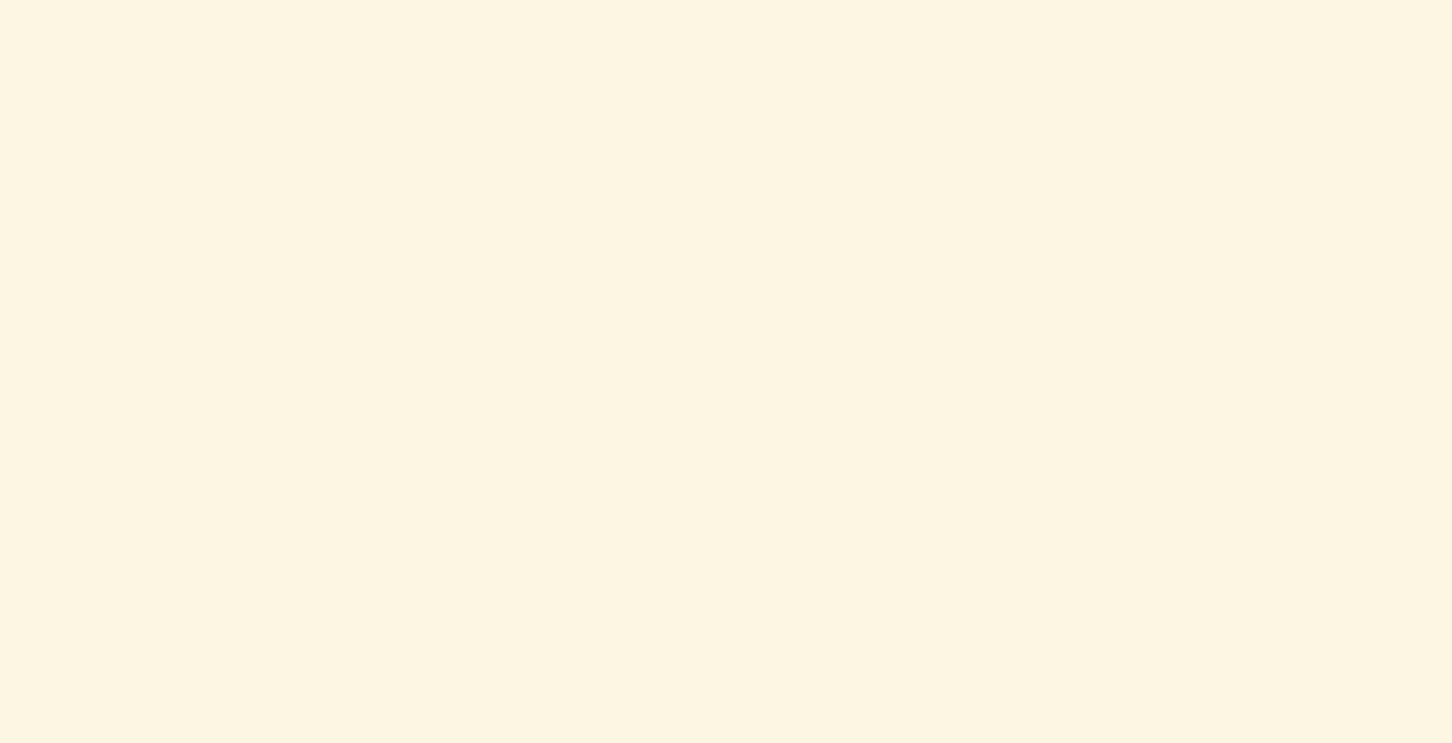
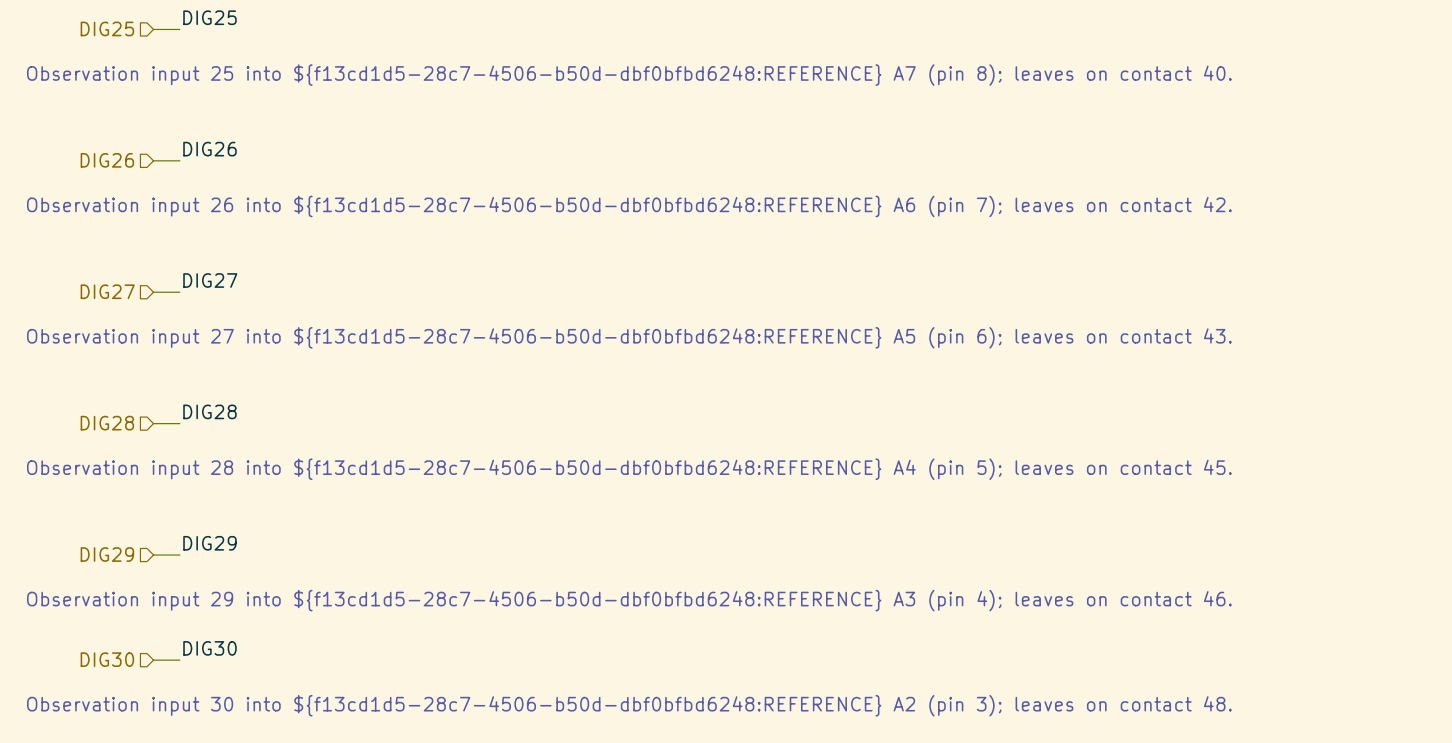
label: none -> DIG25 (209, 17)
hierarchical label: none -> DIG25 (107, 28)
wire: none -> (153, 29) (179, 29)
text: none -> Observation input 25 into ${f13cd1d5-28c7-4506-b50d-dbf0bfbd6248:REFERENCE} A7 (pin 8); leaves on contact 40. (629, 75)
label: none -> DIG26 (209, 149)
hierarchical label: none -> DIG26 (107, 160)
wire: none -> (153, 160) (179, 160)
text: none -> Observation input 26 into ${f13cd1d5-28c7-4506-b50d-dbf0bfbd6248:REFERENCE} A6 (pin 7); leaves on contact 42. (629, 206)
label: none -> DIG27 (210, 280)
hierarchical label: none -> DIG27 (107, 291)
wire: none -> (153, 292) (179, 292)
text: none -> Observation input 27 into ${f13cd1d5-28c7-4506-b50d-dbf0bfbd6248:REFERENCE} A5 (pin 6); leaves on contact 43. (629, 337)
label: none -> DIG28 (209, 411)
hierarchical label: none -> DIG28 (107, 423)
wire: none -> (153, 423) (179, 423)
text: none -> Observation input 28 into ${f13cd1d5-28c7-4506-b50d-dbf0bfbd6248:REFERENCE} A4 (pin 5); leaves on contact 45. (629, 469)
label: none -> DIG29 (209, 543)
hierarchical label: none -> DIG29 (107, 554)
wire: none -> (153, 555) (179, 555)
text: none -> Observation input 29 into ${f13cd1d5-28c7-4506-b50d-dbf0bfbd6248:REFERENCE} A3 (pin 4); leaves on contact 46. (629, 600)
label: none -> DIG30 (209, 648)
hierarchical label: none -> DIG30 (107, 659)
wire: none -> (153, 660) (179, 660)
text: none -> Observation input 30 into ${f13cd1d5-28c7-4506-b50d-dbf0bfbd6248:REFERENCE} A2 (pin 3); leaves on contact 48. (629, 705)

